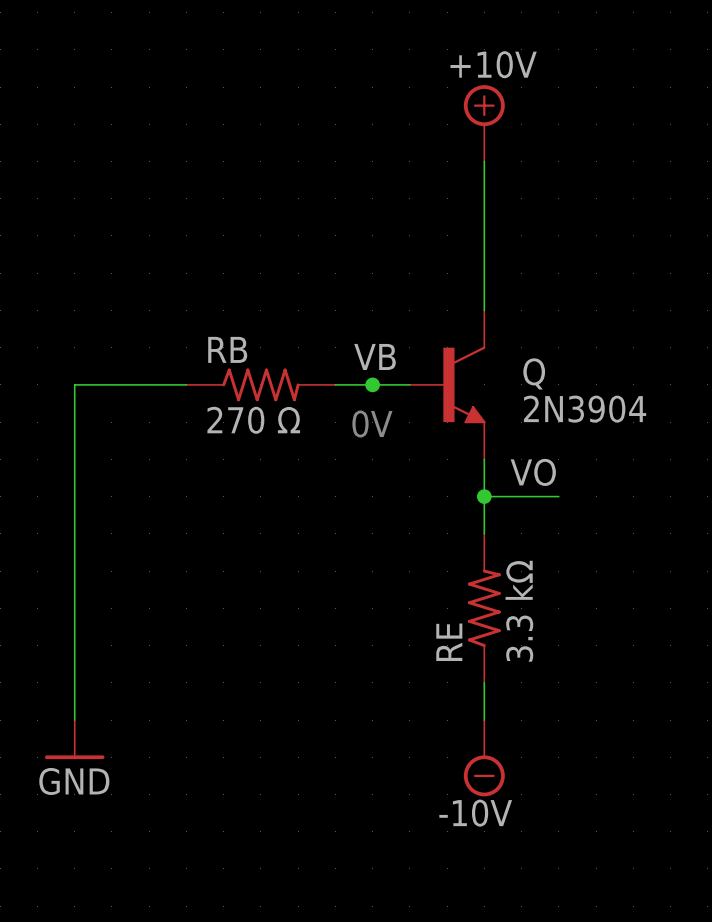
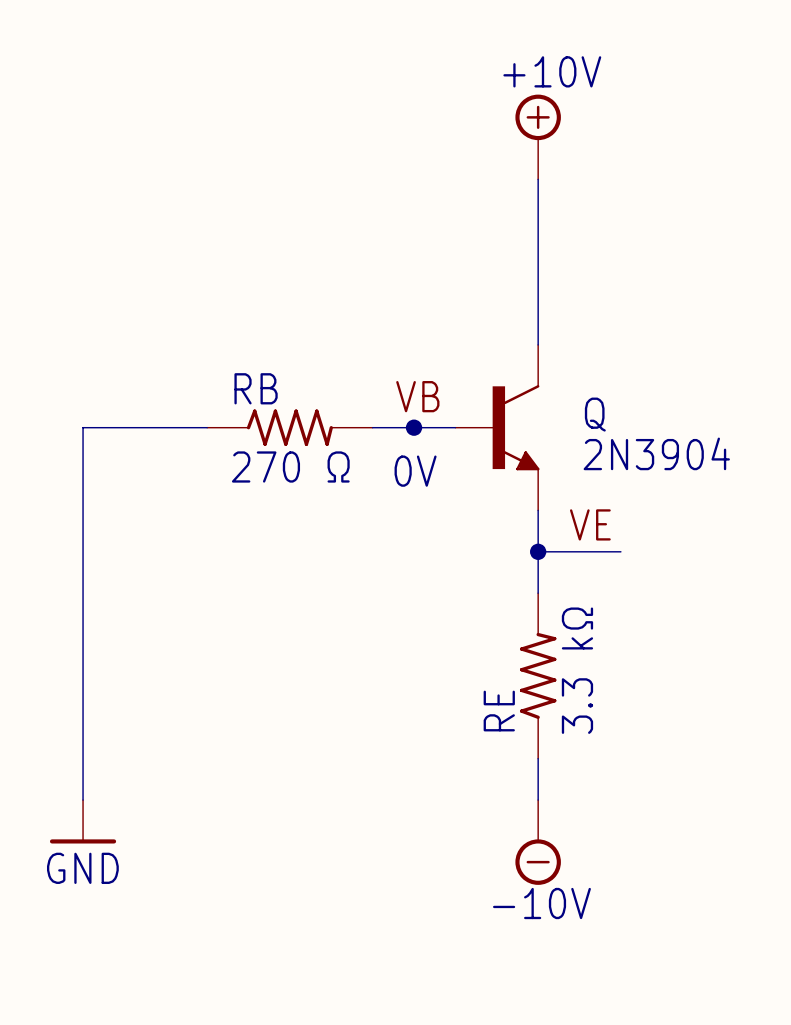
label: VO (533, 472) -> VE (590, 524)

